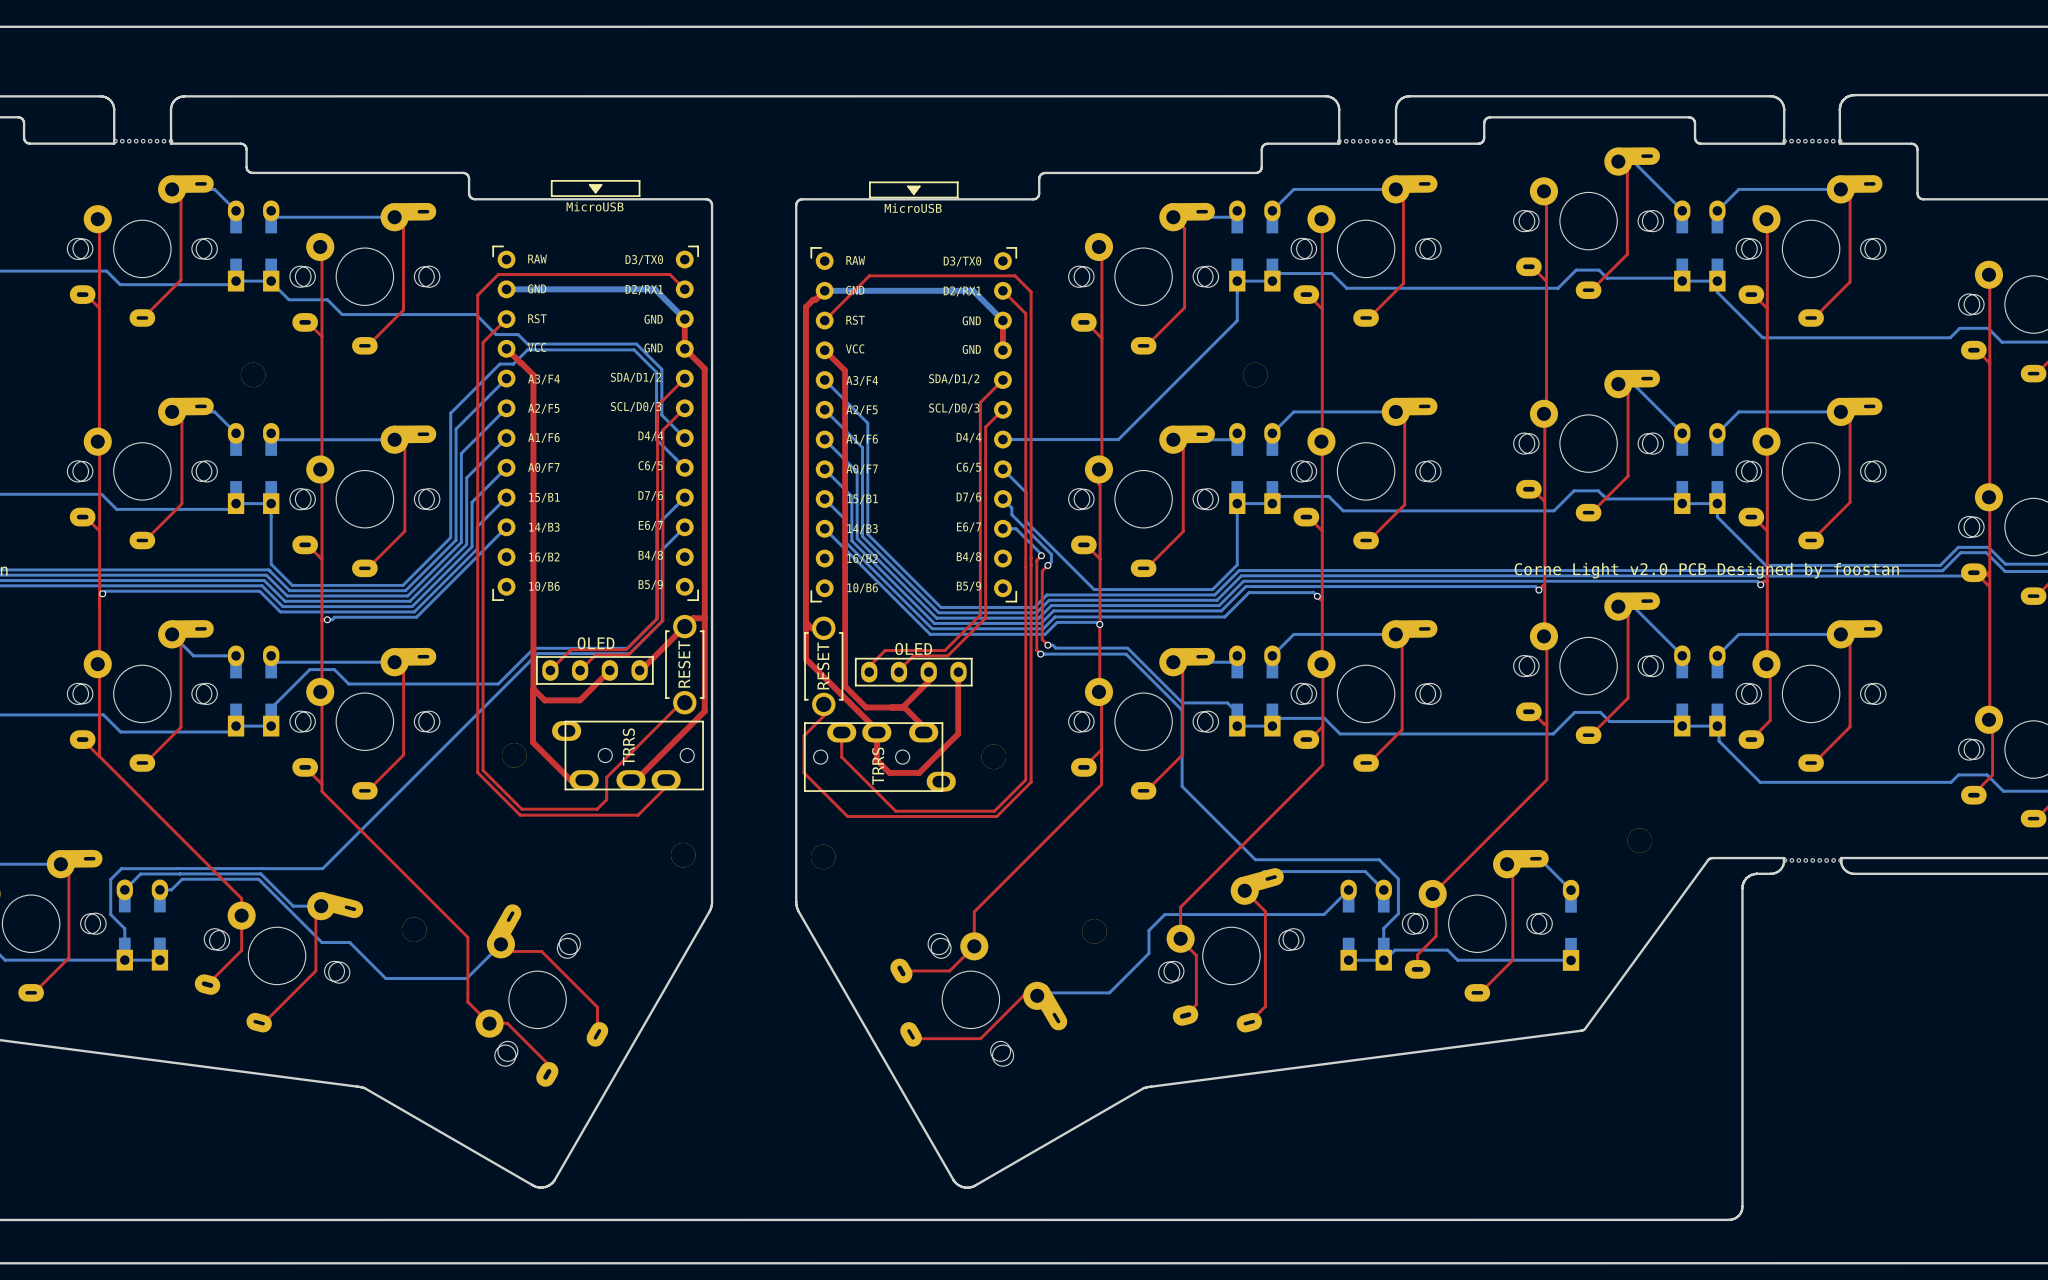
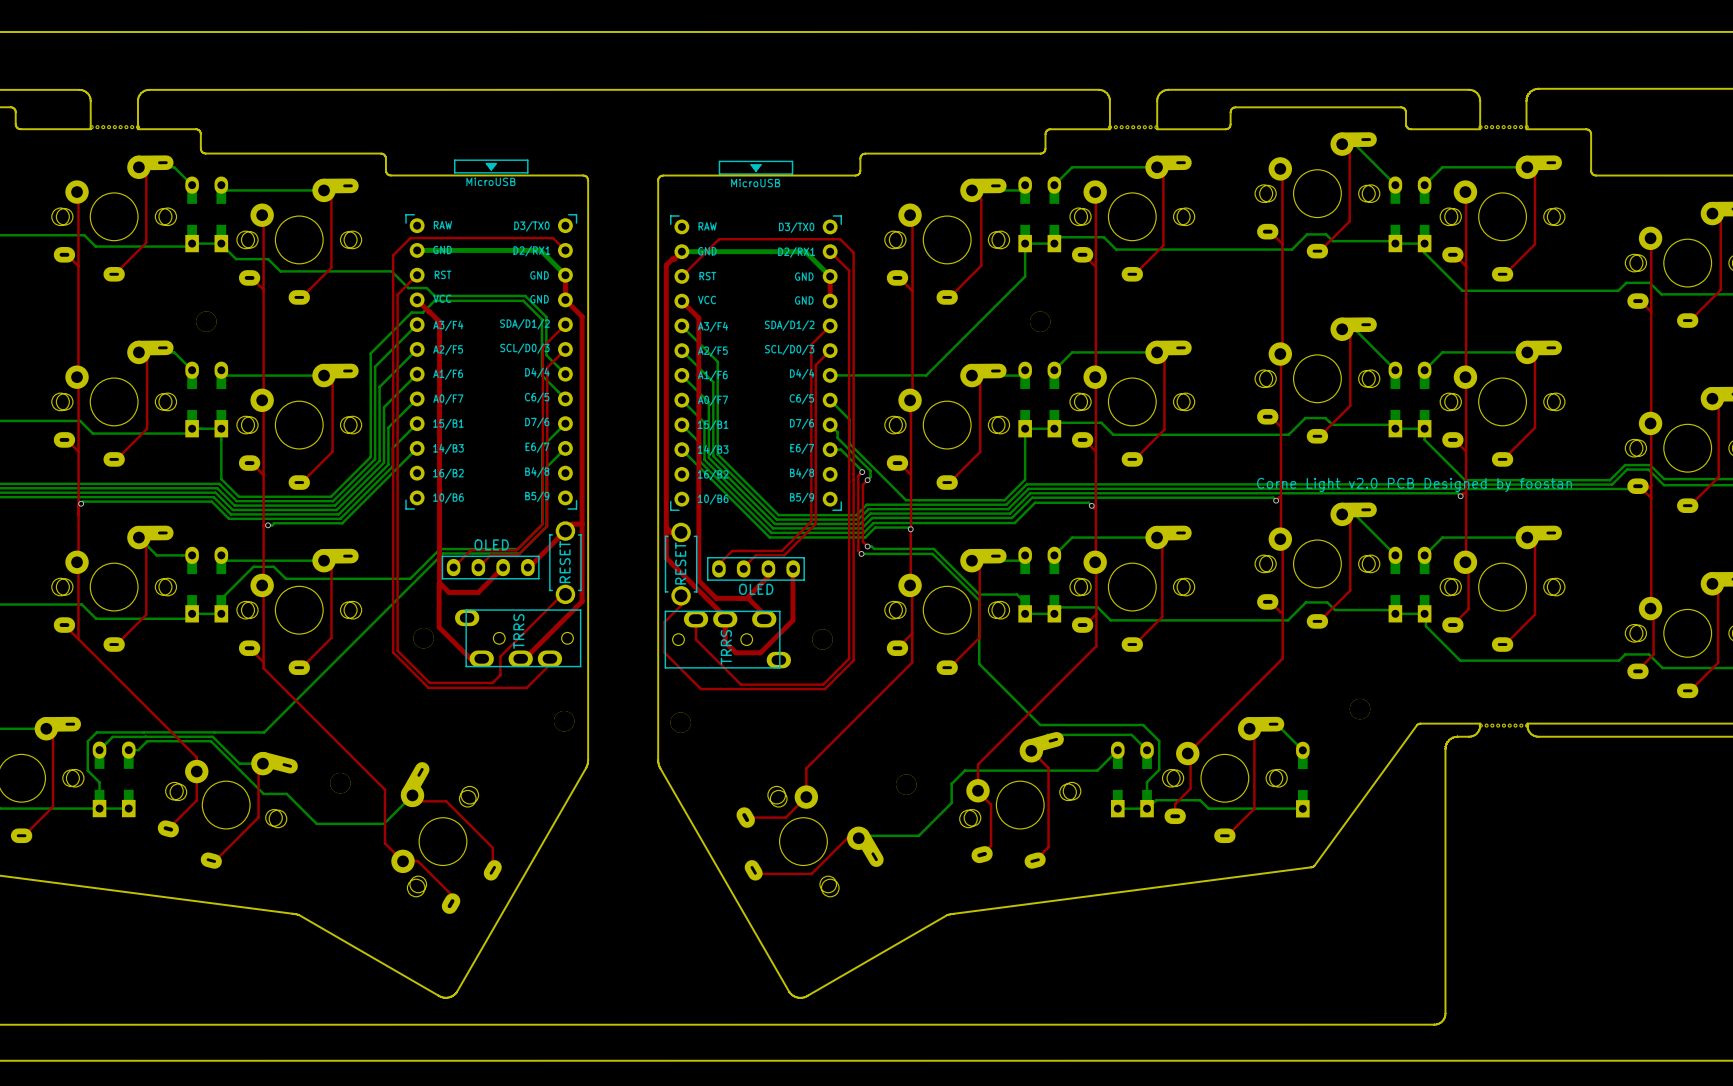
part text position: OLED (913, 648) -> OLED (756, 589)

